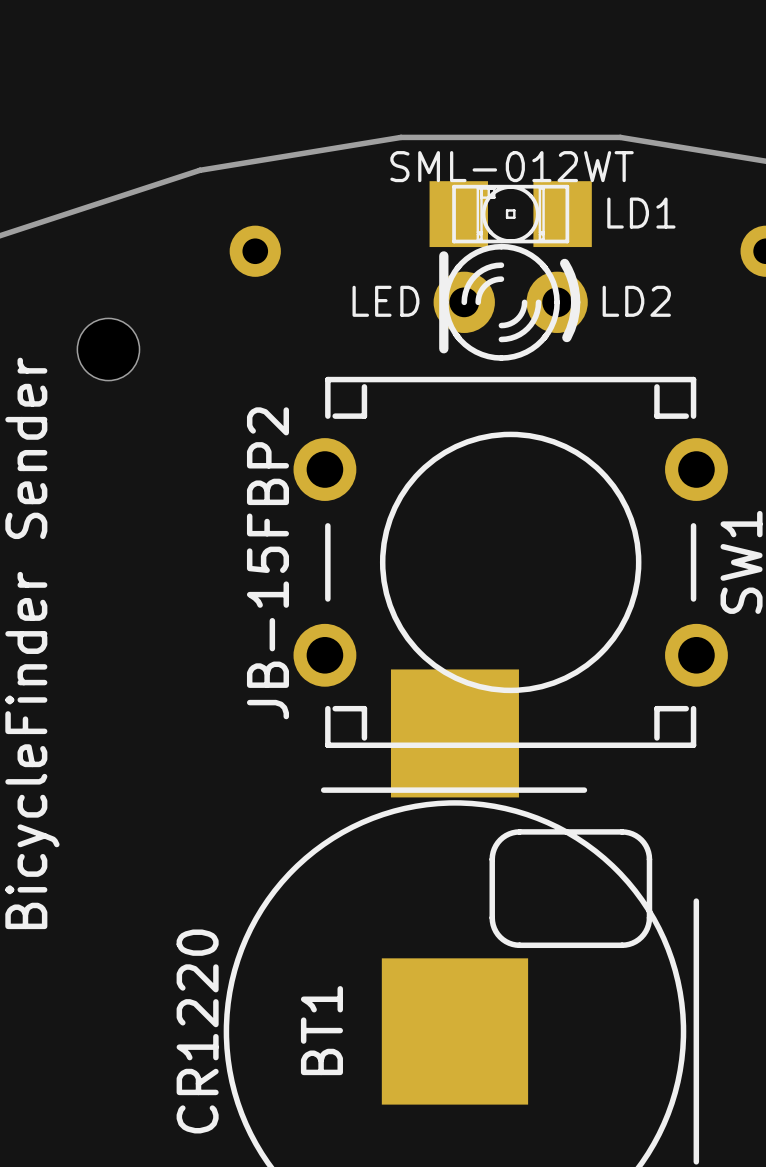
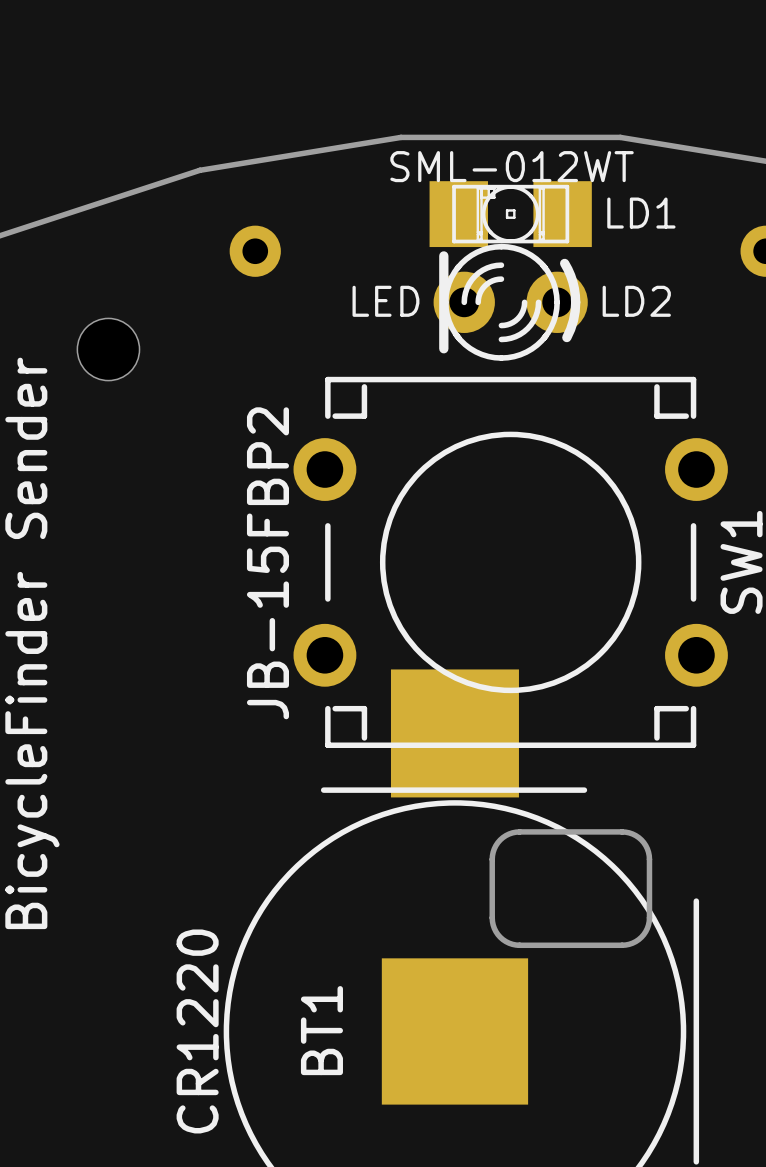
part footprint: [489, 829, 653, 949] -> [489, 829, 653, 949]

